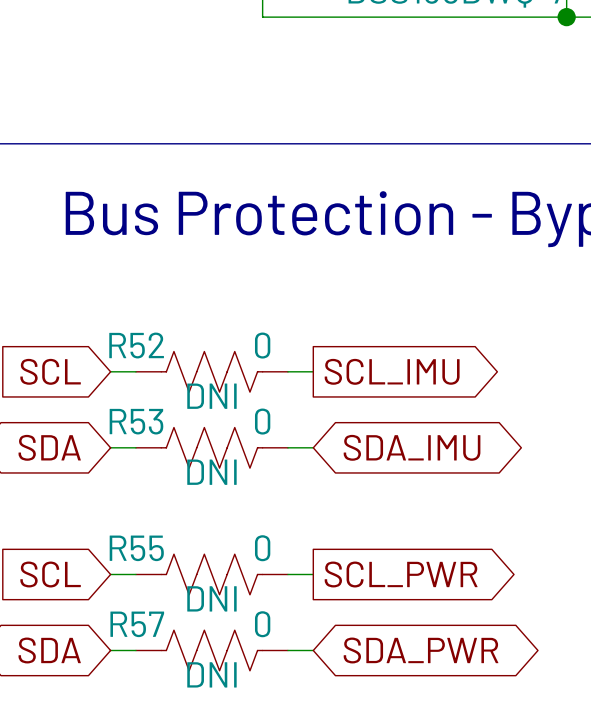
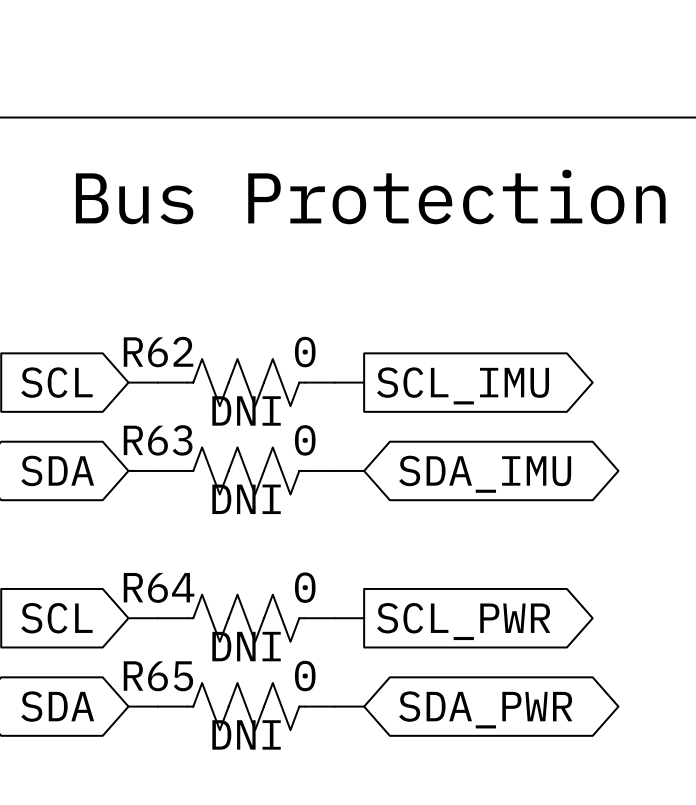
R52 name: R52 (136, 345) -> R62 (158, 352)
R53 name: R53 (136, 421) -> R63 (158, 440)
R55 name: R55 (136, 548) -> R64 (159, 587)
R57 name: R57 (137, 624) -> R65 (158, 676)

